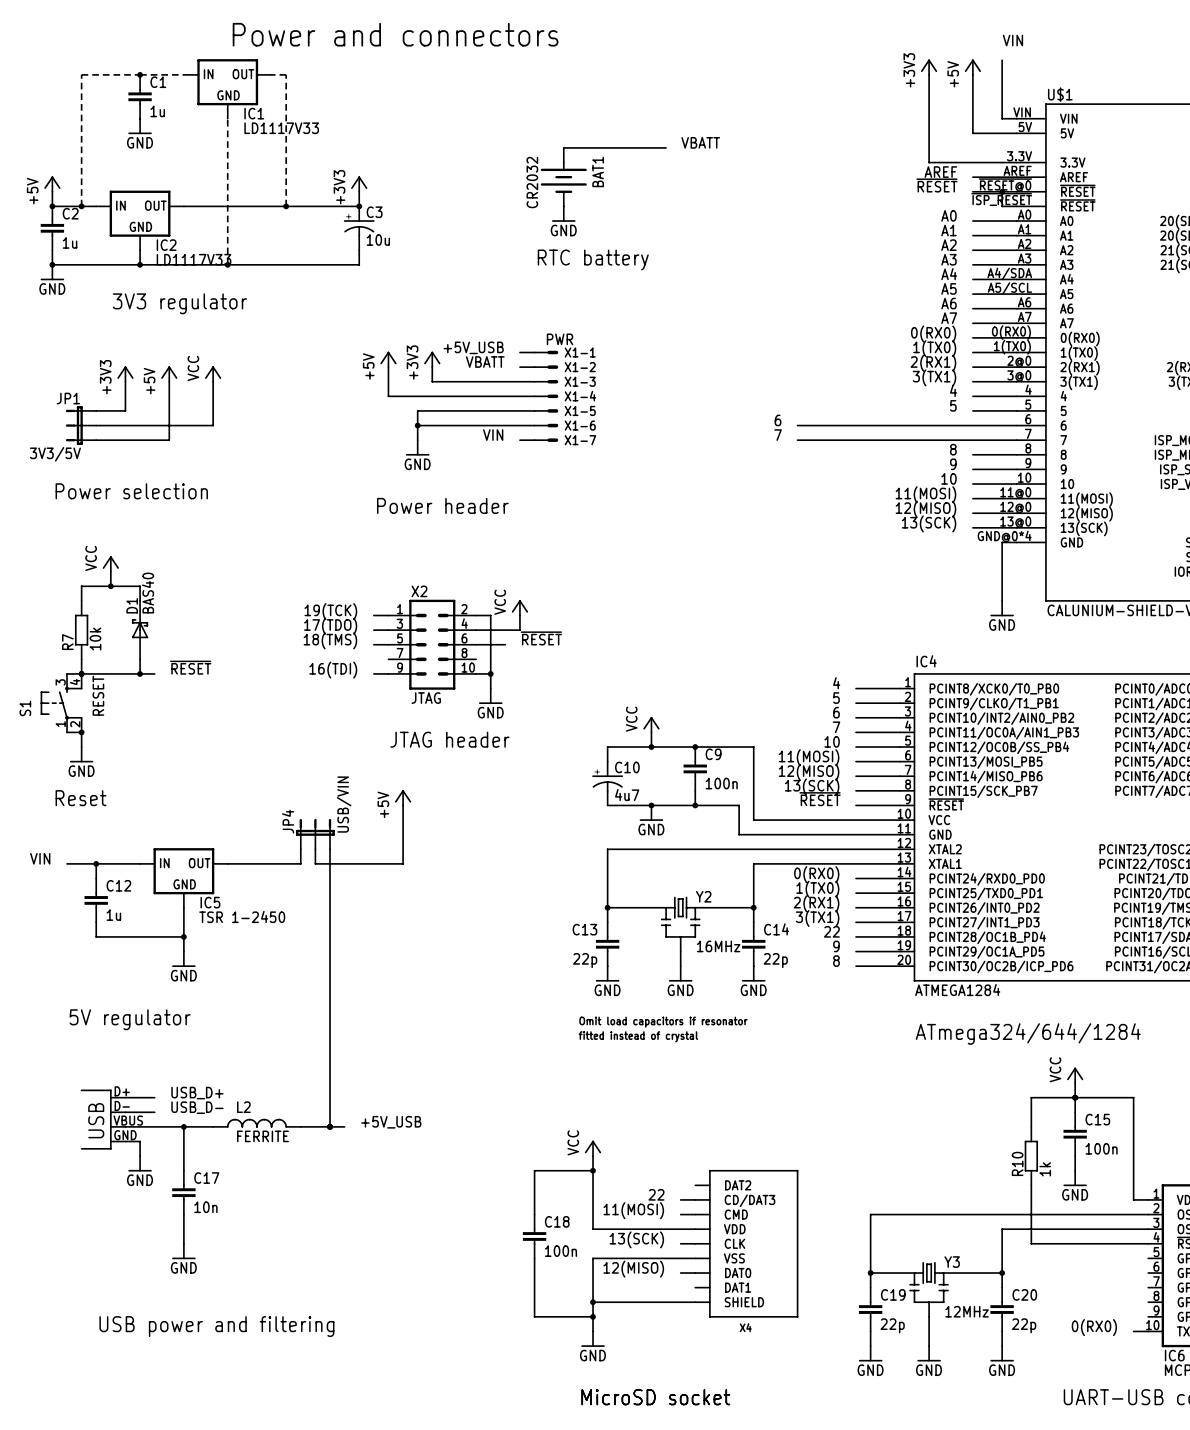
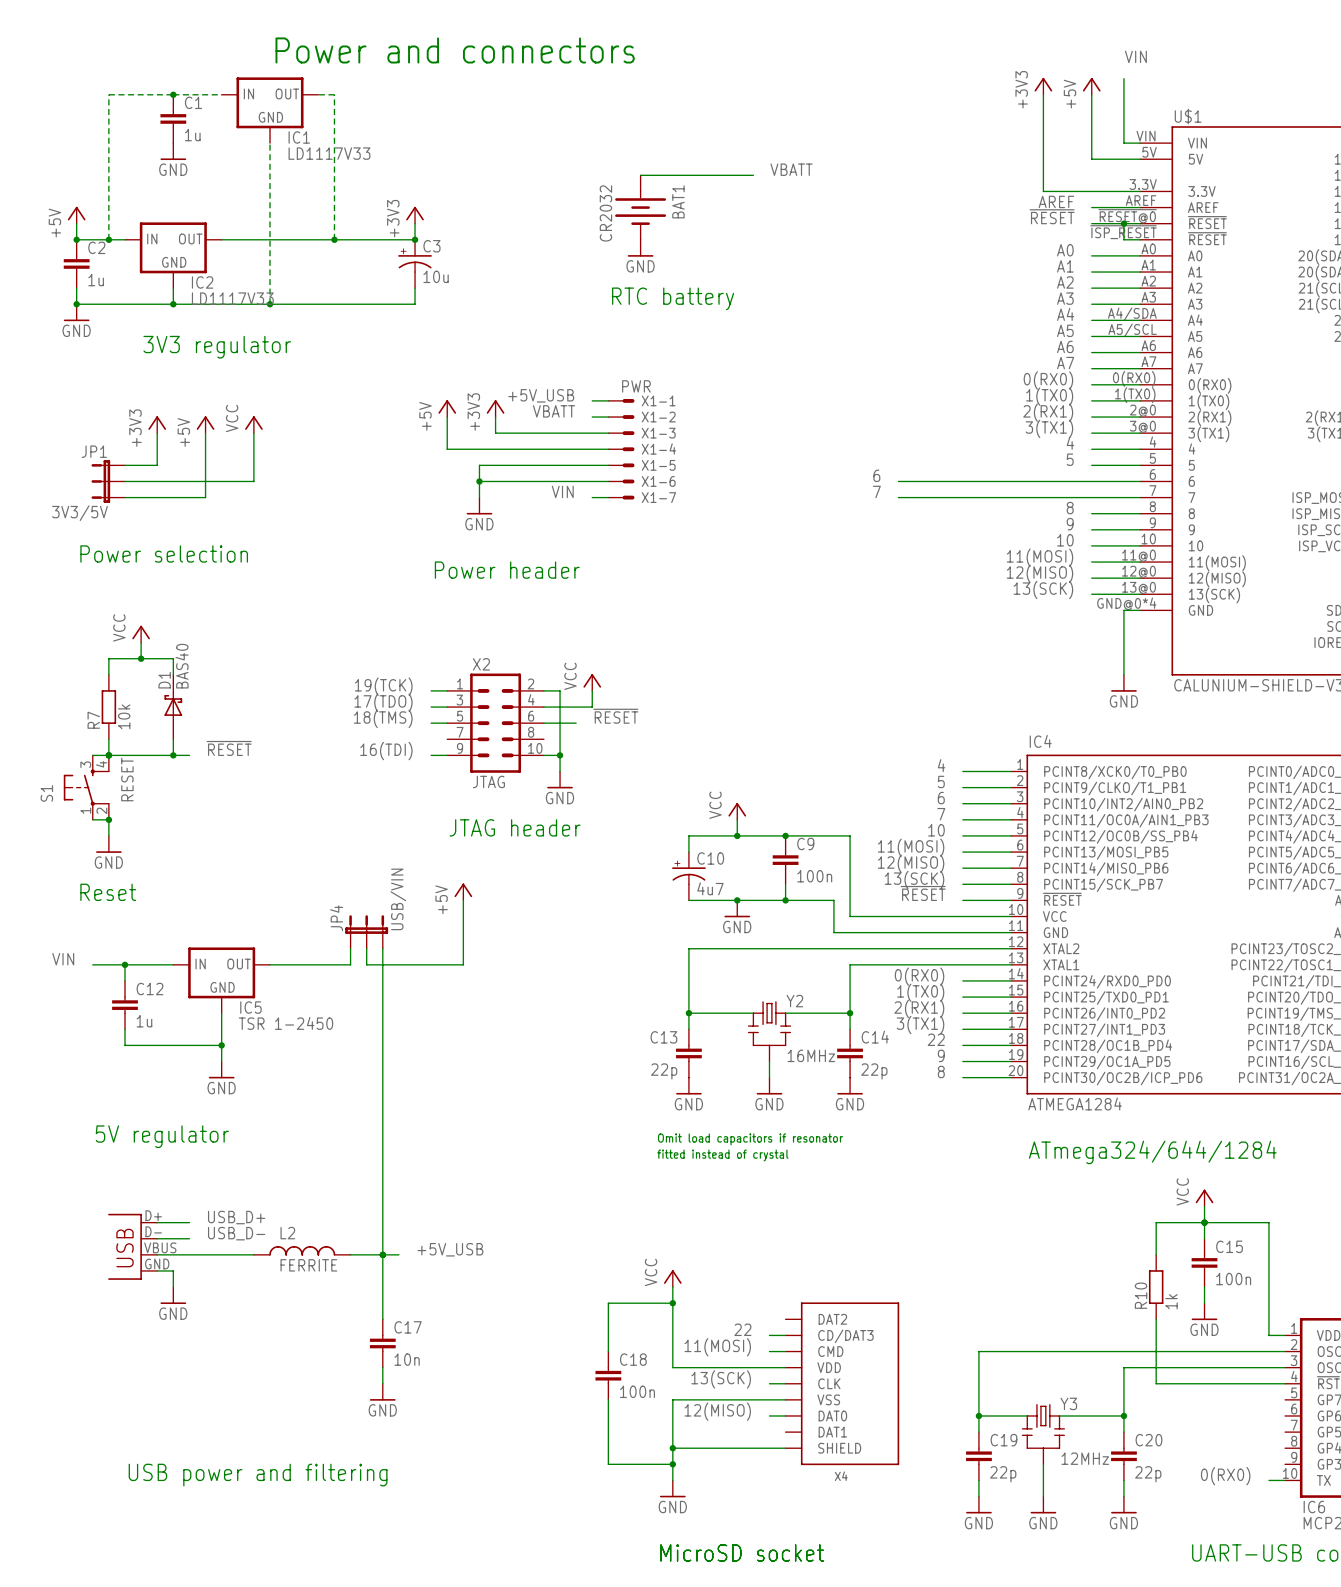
wire: (183, 1126) (183, 1170) -> none
junction: (183, 1126) -> none
wire: none -> (382, 1254) (382, 1319)
C17 position: (183, 1192) -> (382, 1343)
wire: (183, 1214) (183, 1243) -> none
wire: none -> (382, 1367) (382, 1383)
power symbol: GND (183, 1251) -> none
power symbol: none -> GND (382, 1392)

